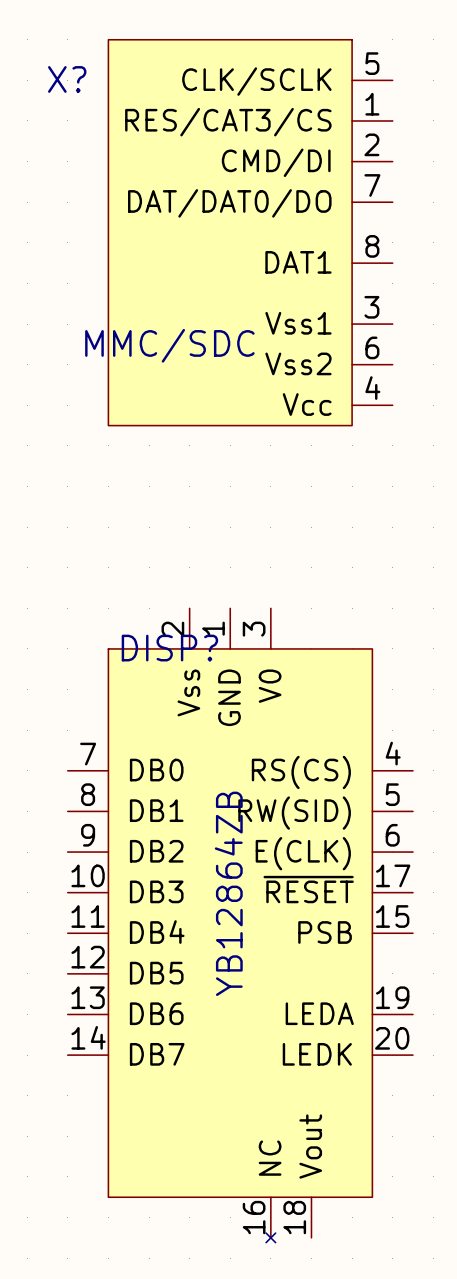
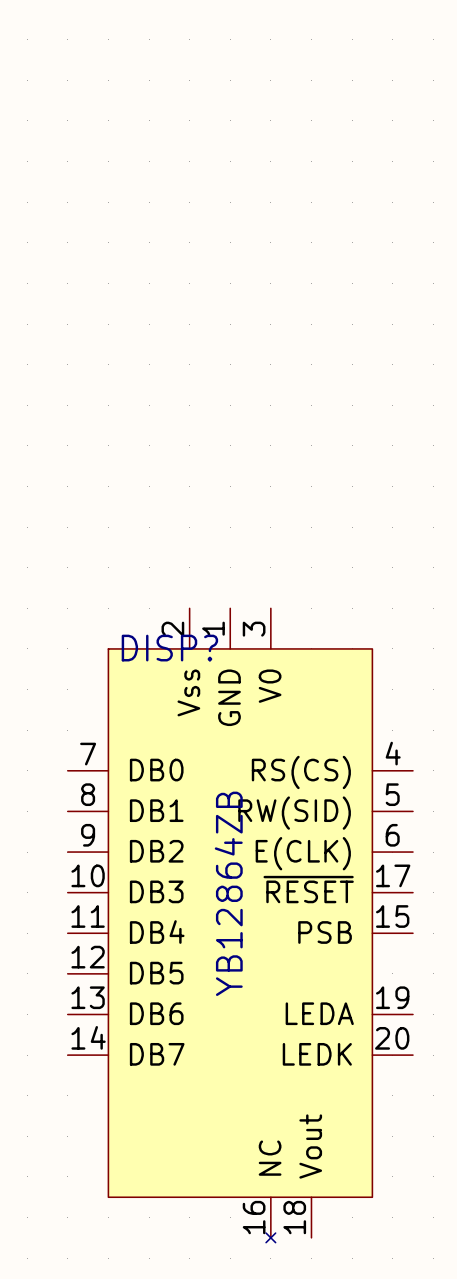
X?: MMC/SDC (250, 232) -> none

